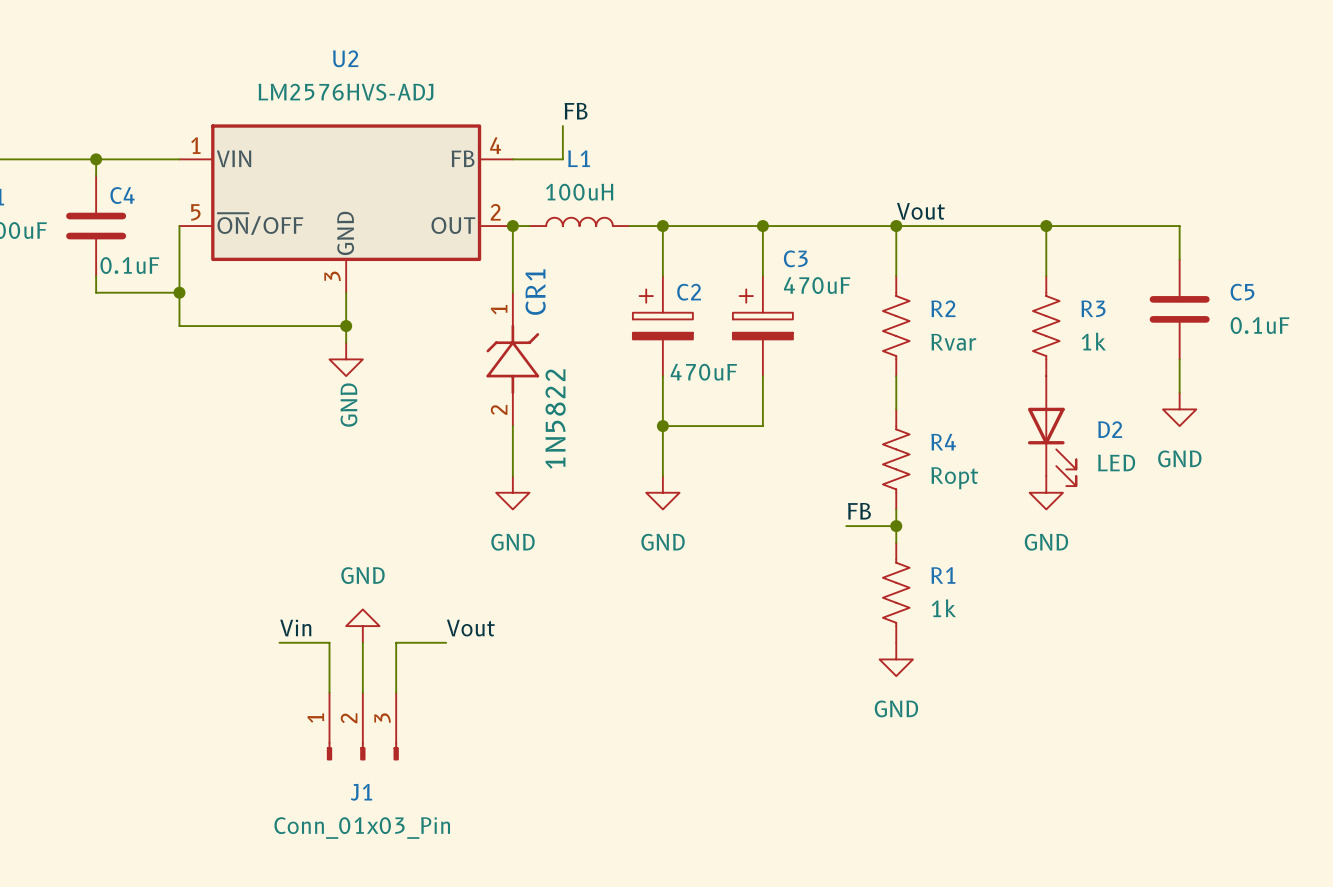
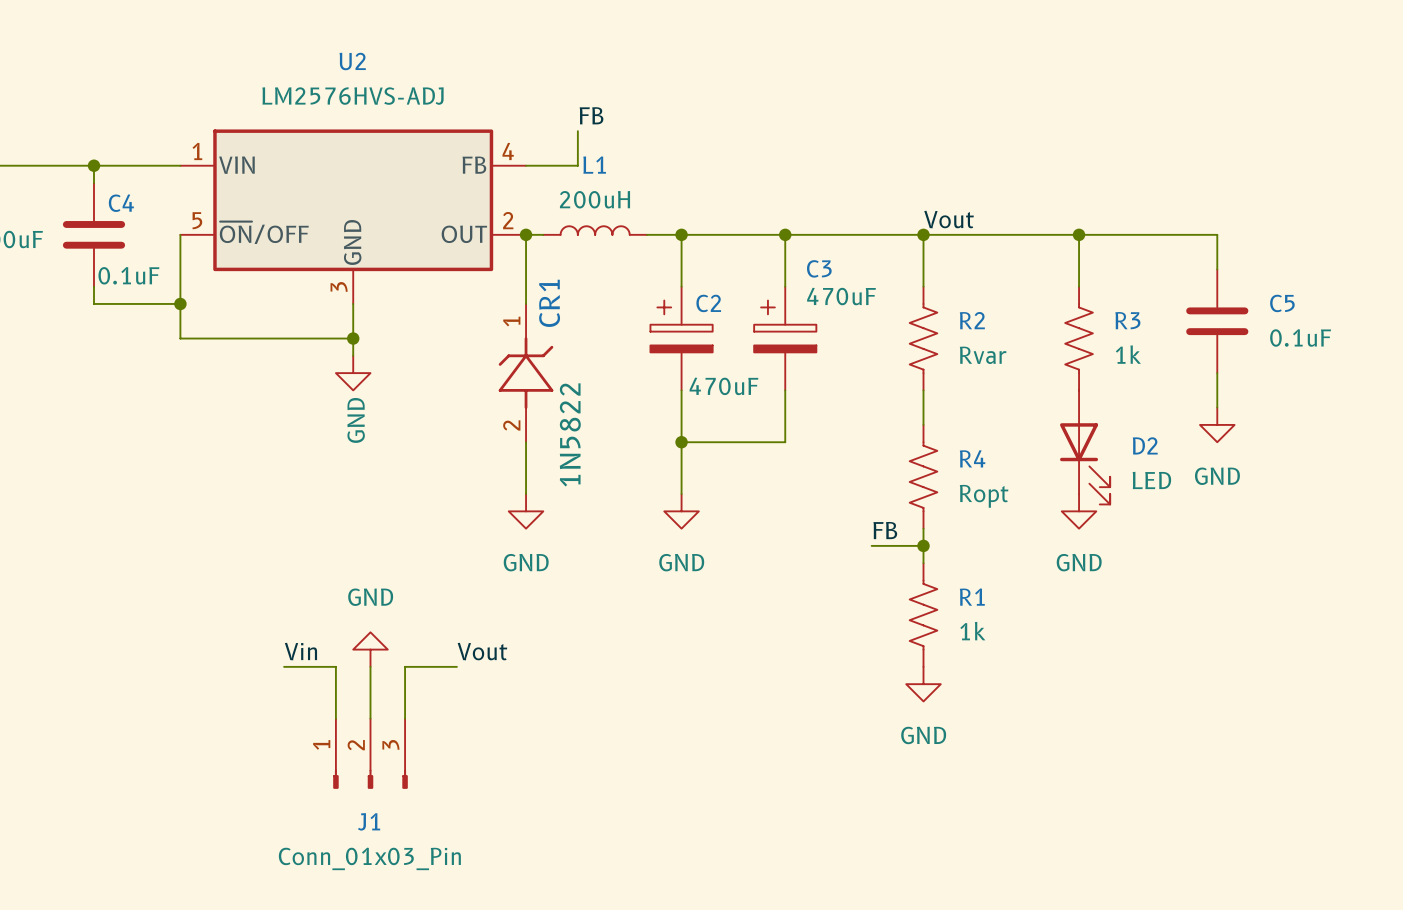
L1 value: 100uH (579, 192) -> 200uH (594, 199)

